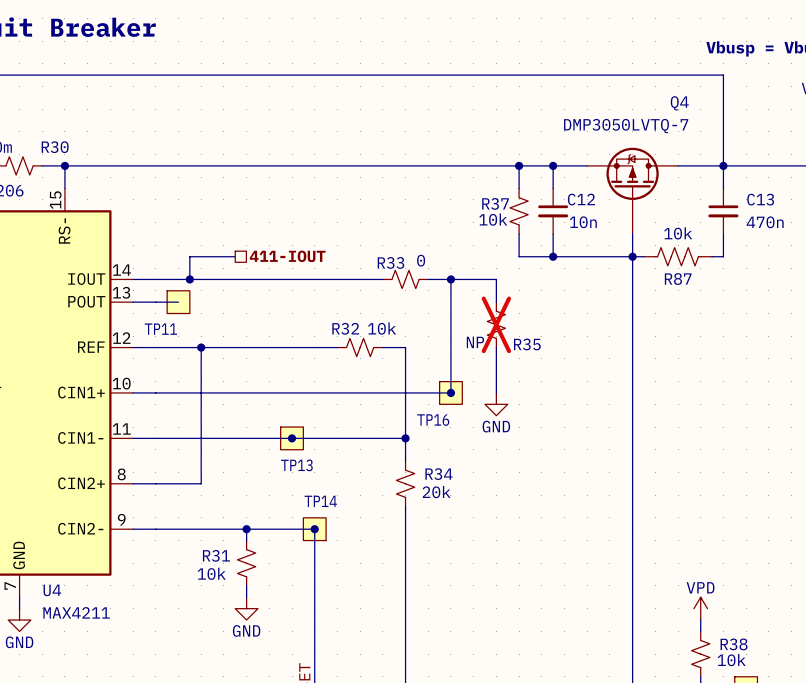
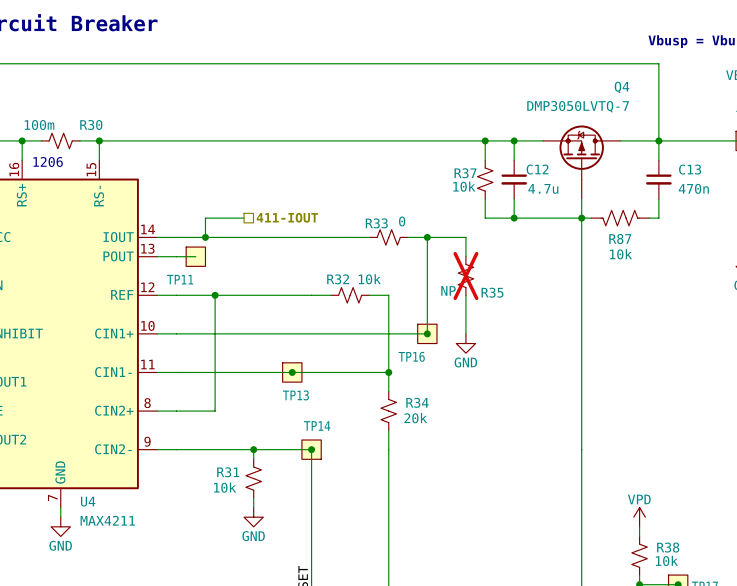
C12 value: 10n (583, 222) -> 4.7u (543, 188)
R87 value position: 10k (678, 233) -> 10k (620, 254)
R87 flip: as is (678, 256) -> left-right (620, 218)

